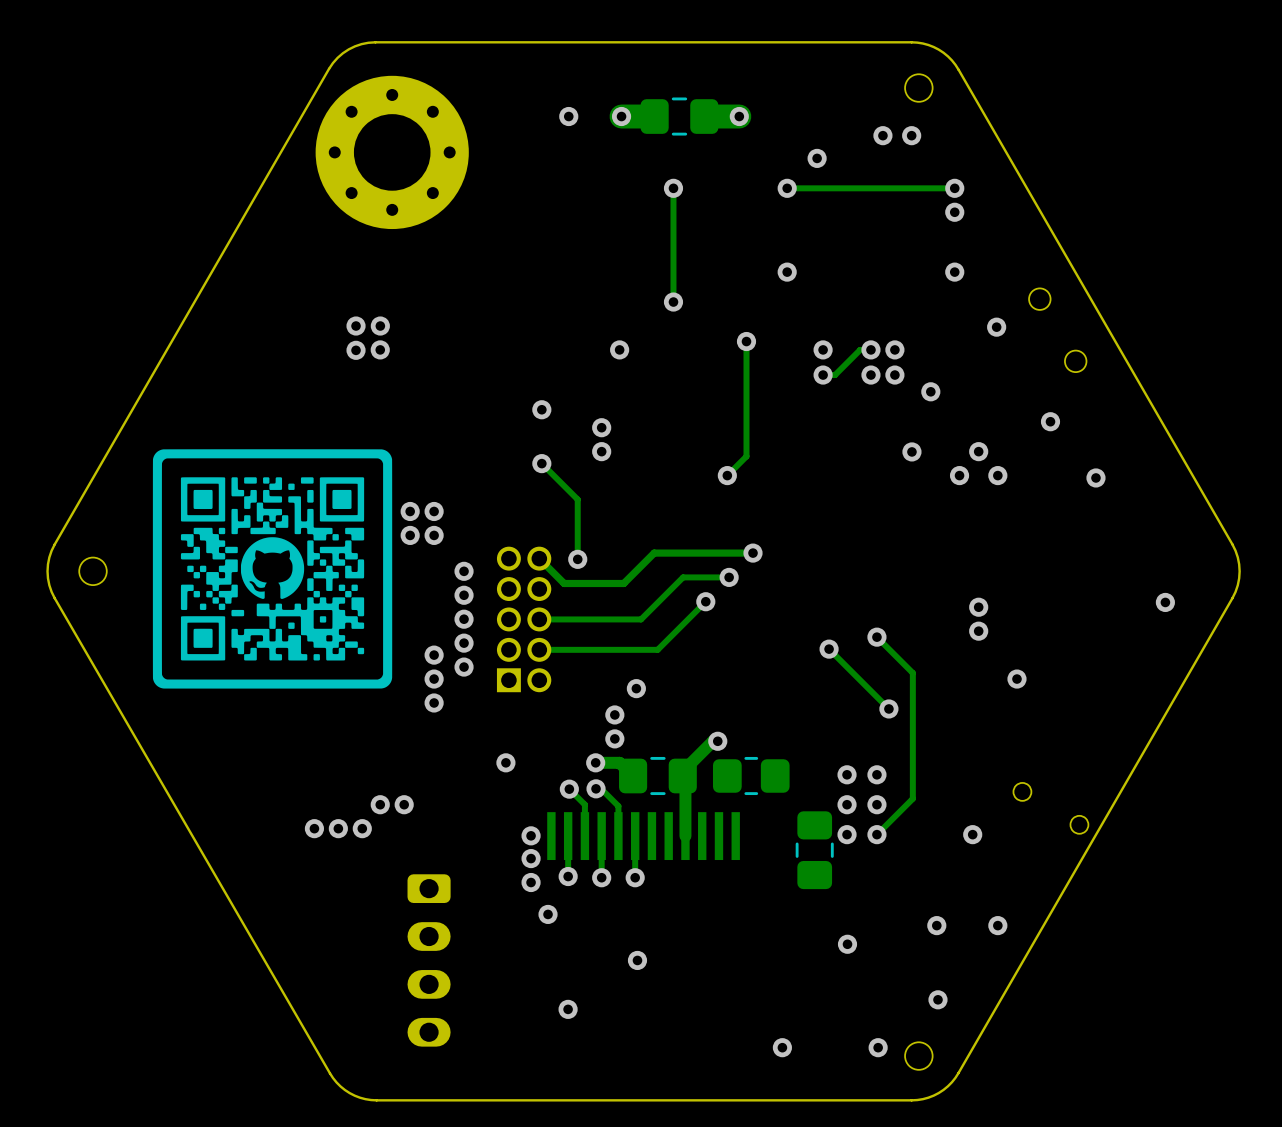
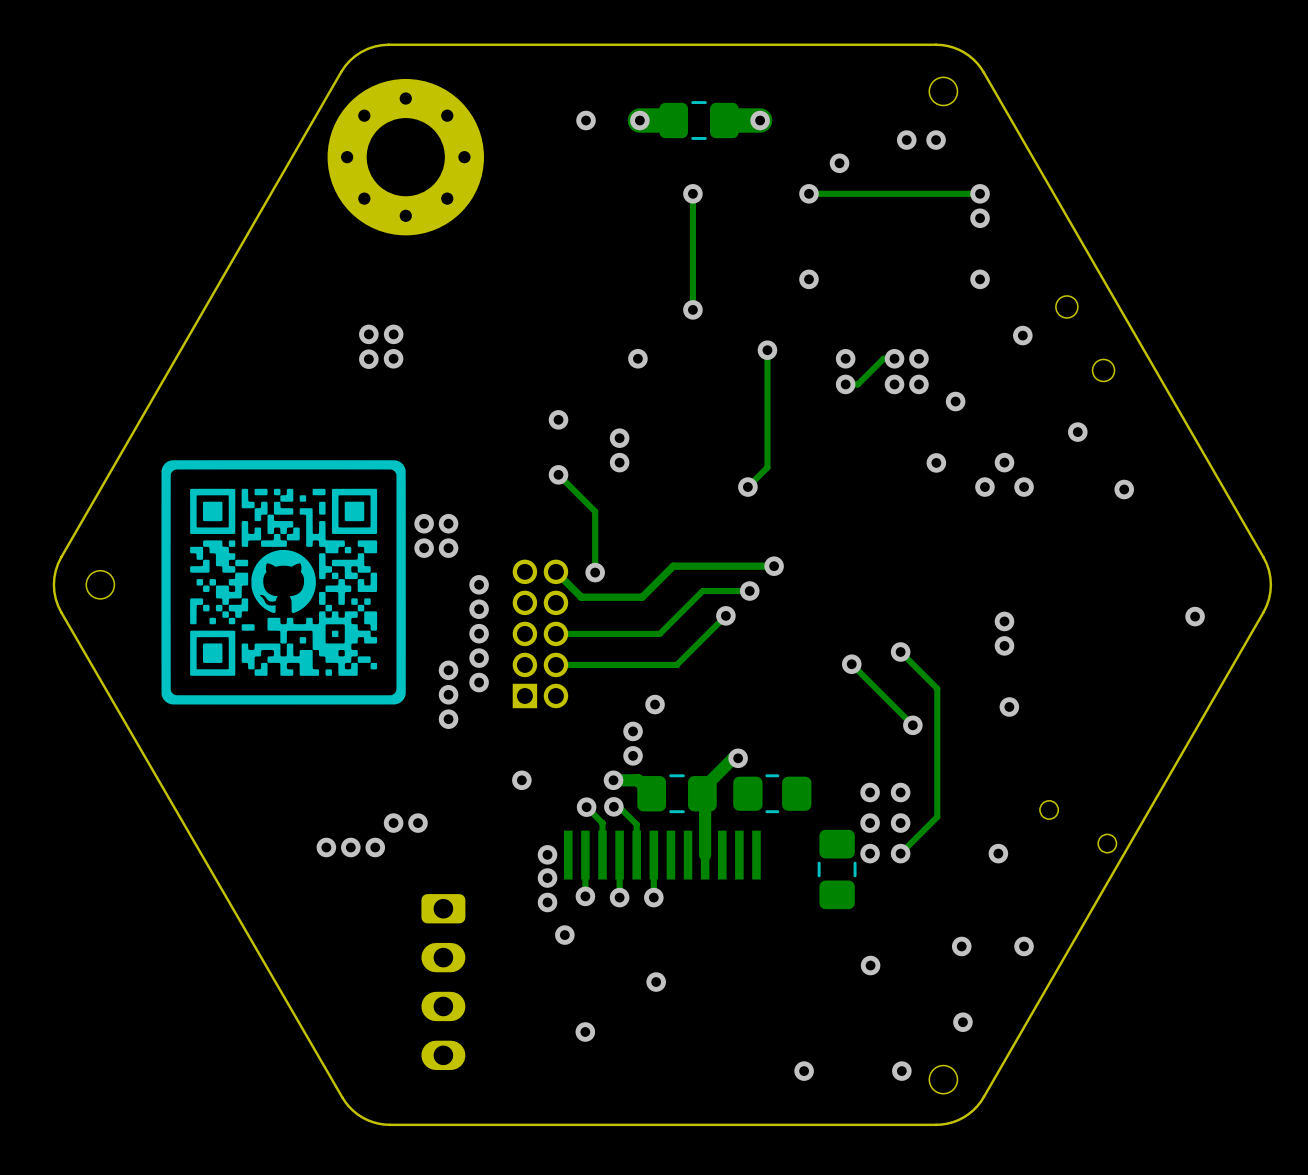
via position: (1016, 679) -> (1009, 706)

